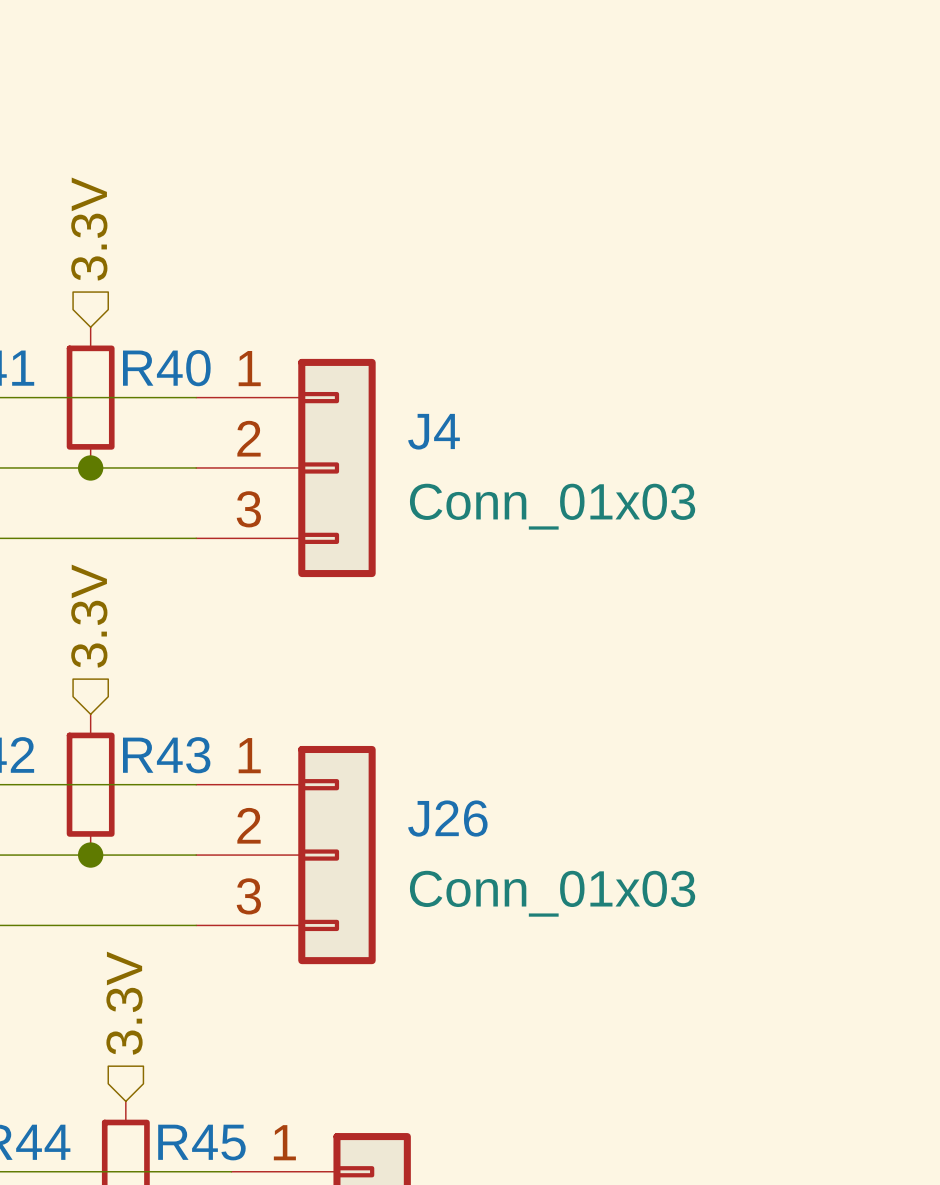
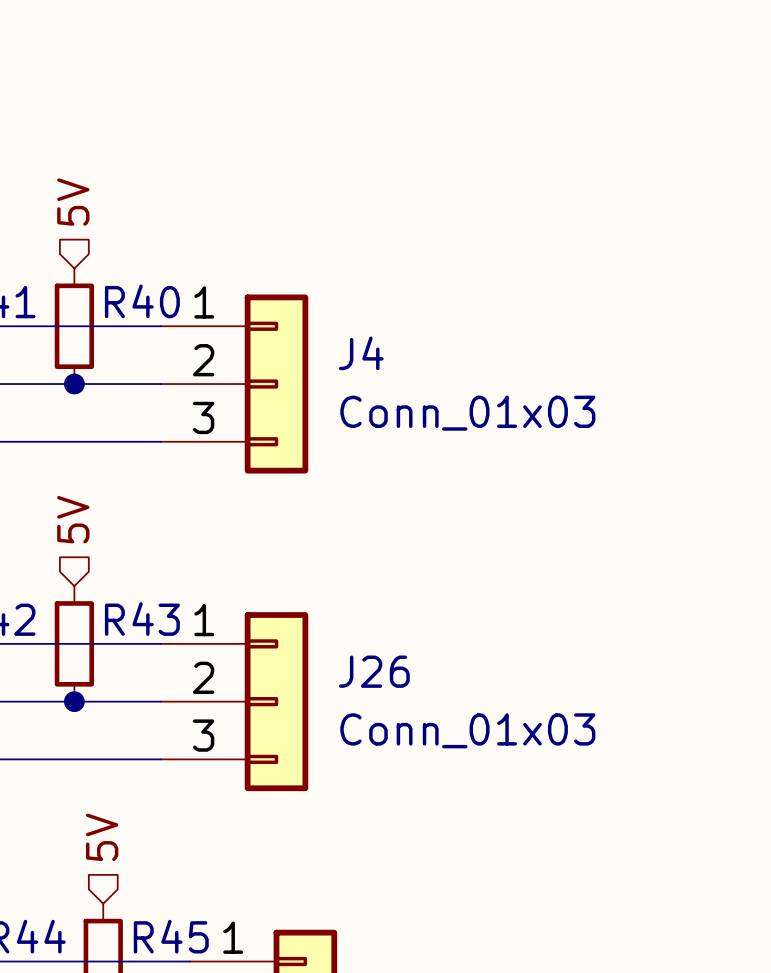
hierarchical label: 3.3V (89, 229) -> 5V (73, 202)
hierarchical label: 3.3V (89, 616) -> 5V (73, 519)
hierarchical label: 3.3V (124, 1003) -> 5V (102, 837)

